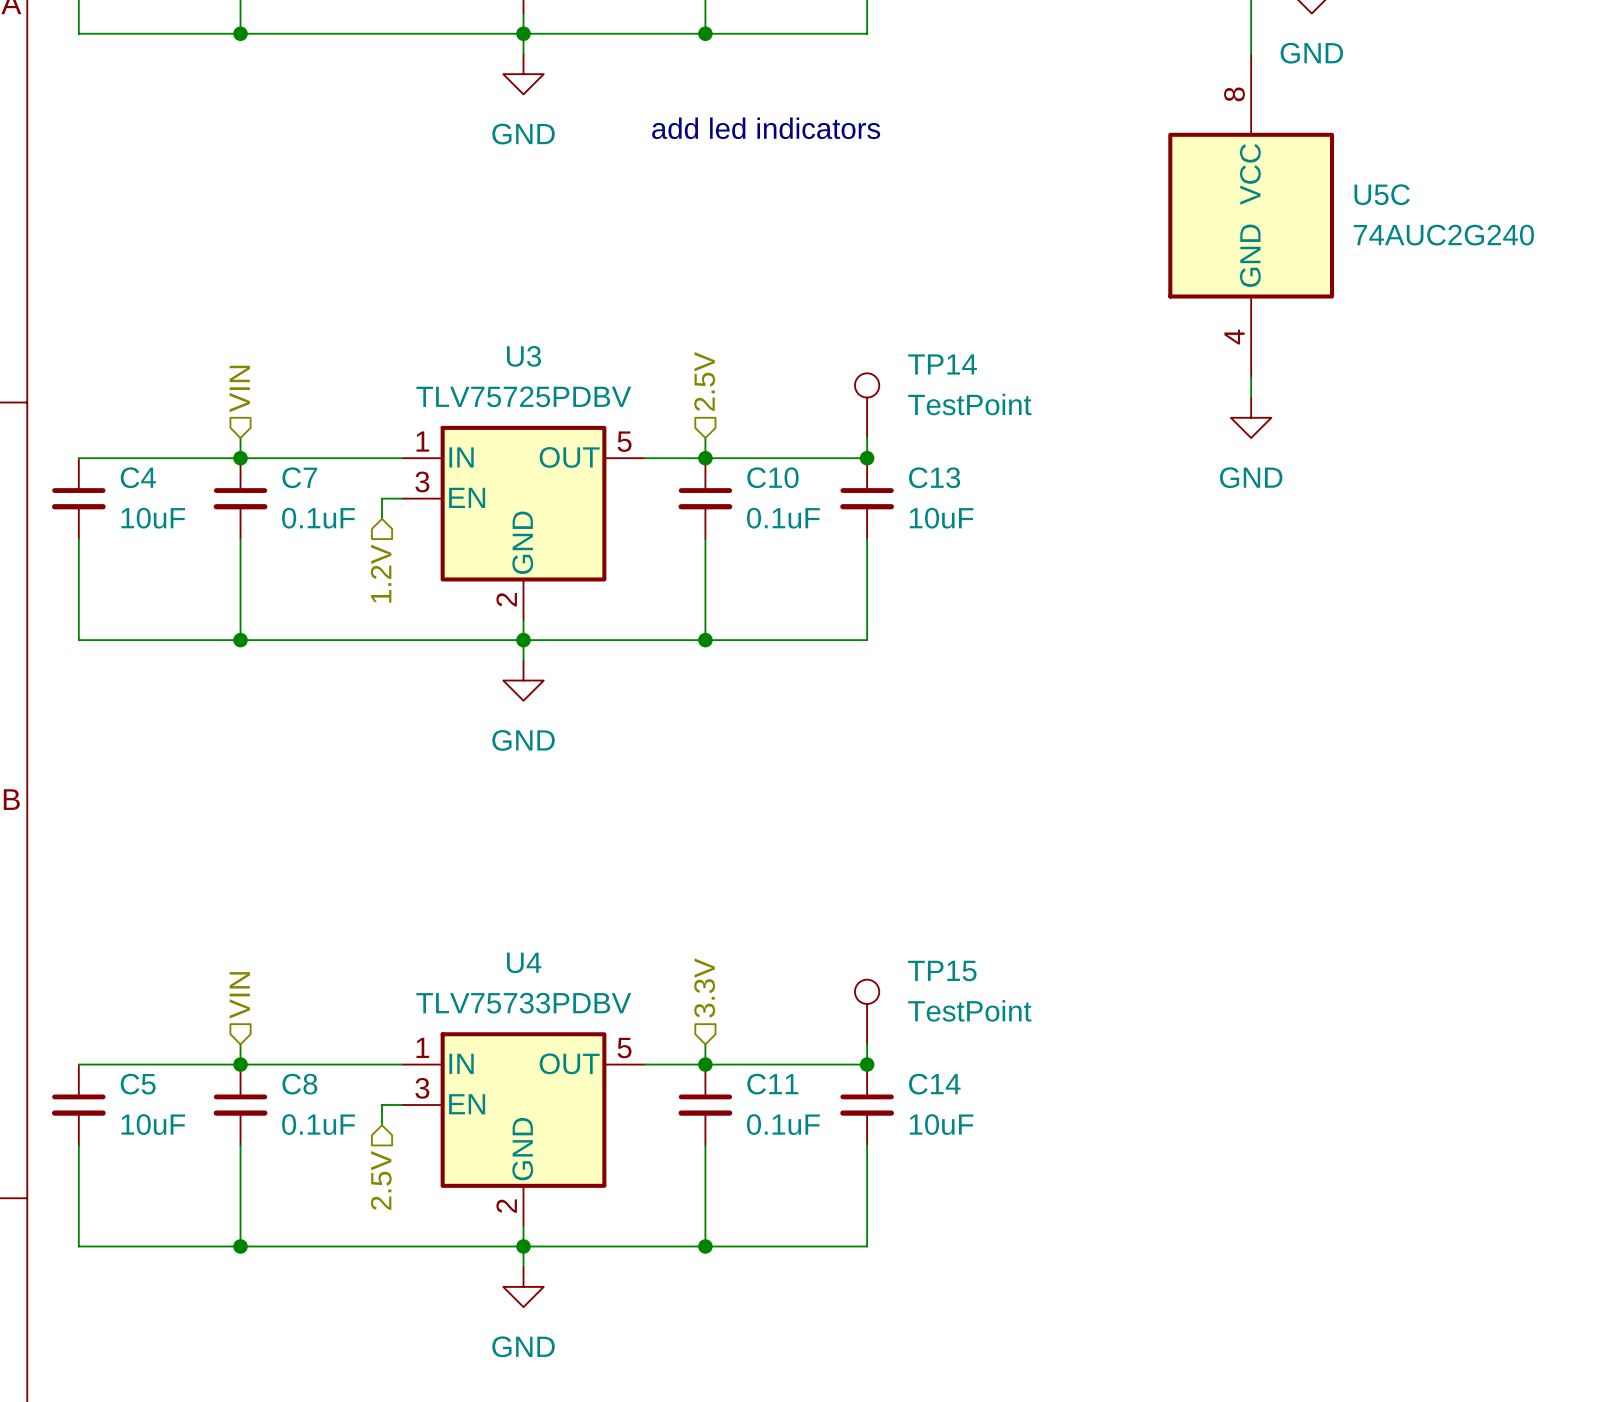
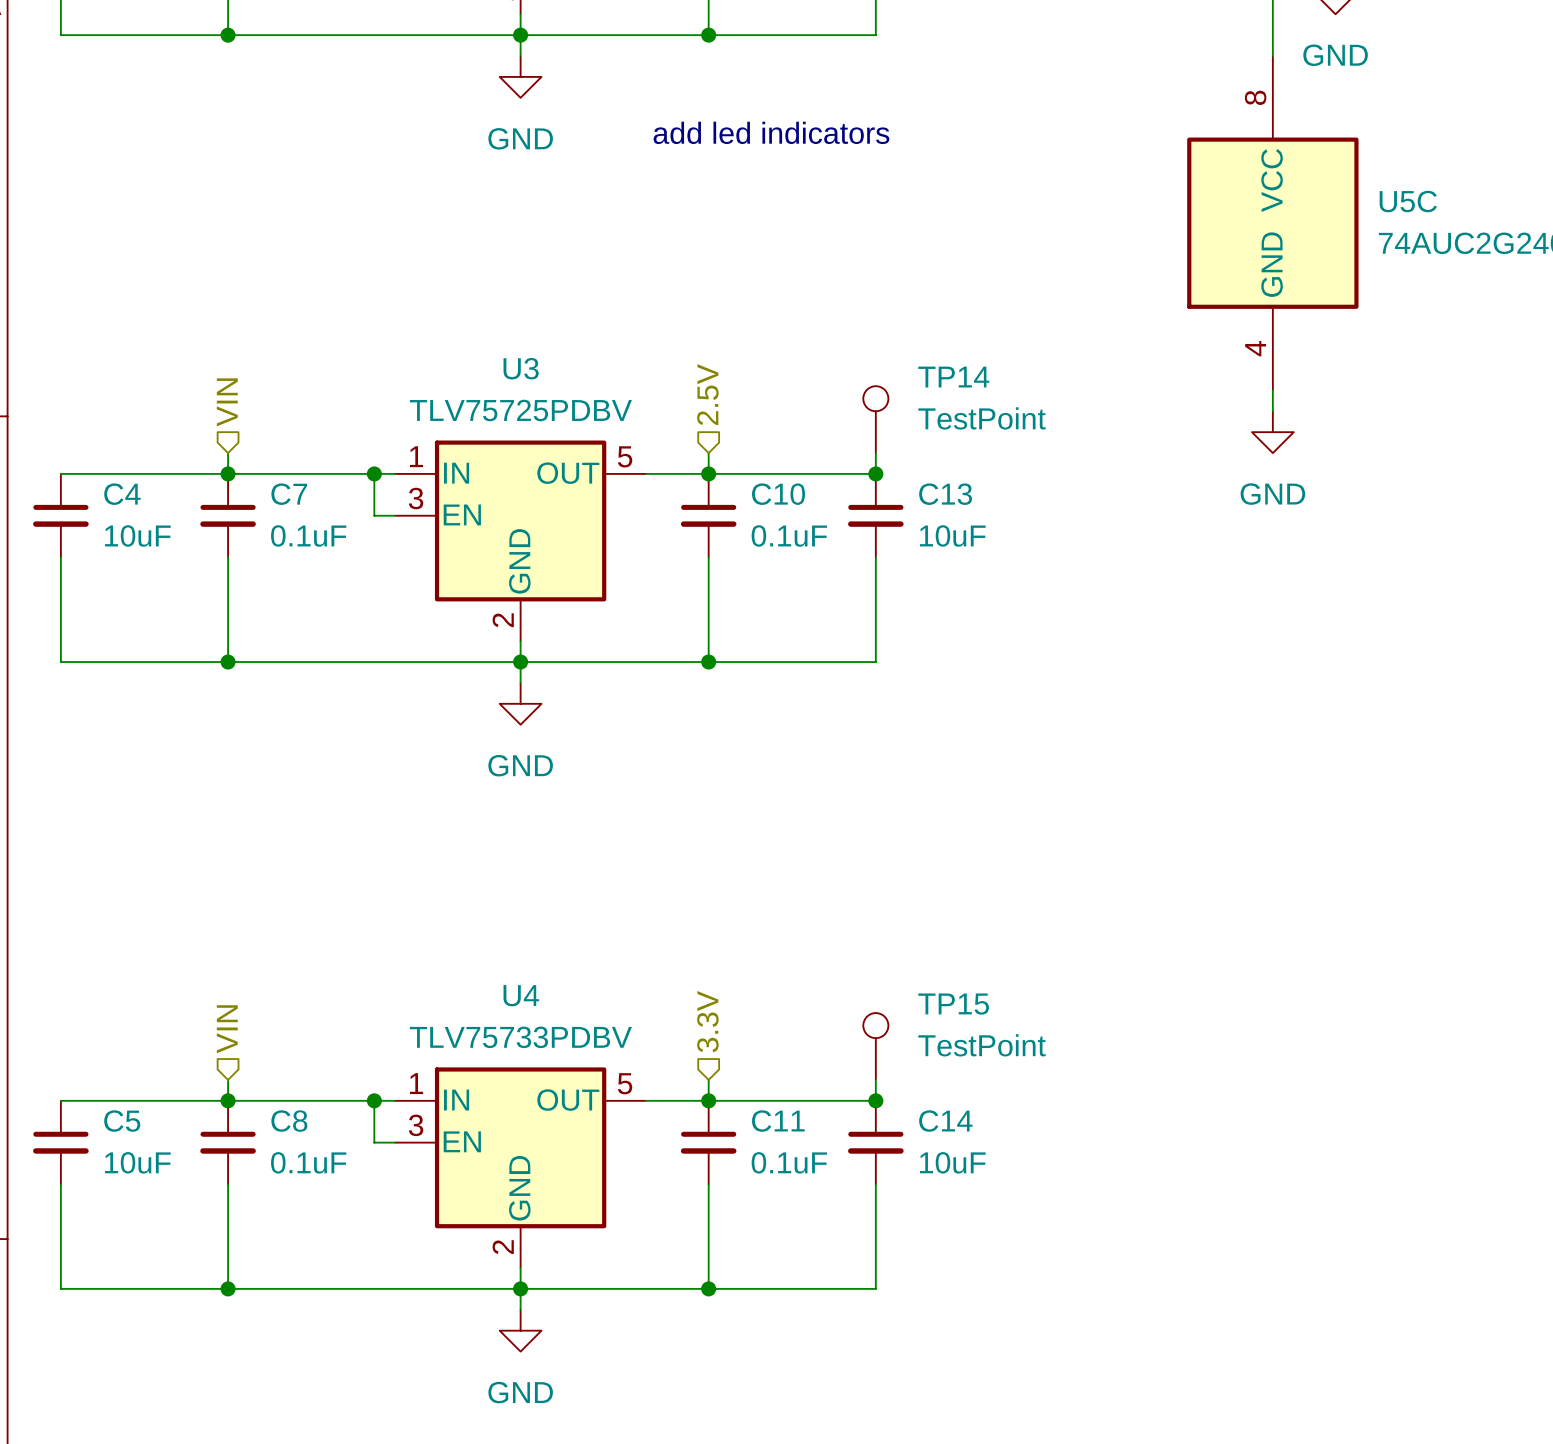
junction: none -> (374, 473)
wire: (382, 498) (382, 518) -> (374, 515) (374, 473)
hierarchical label: 1.2V (381, 573) -> none
junction: none -> (374, 1100)
wire: (382, 1105) (382, 1125) -> (374, 1142) (374, 1100)
hierarchical label: 2.5V (381, 1180) -> none

